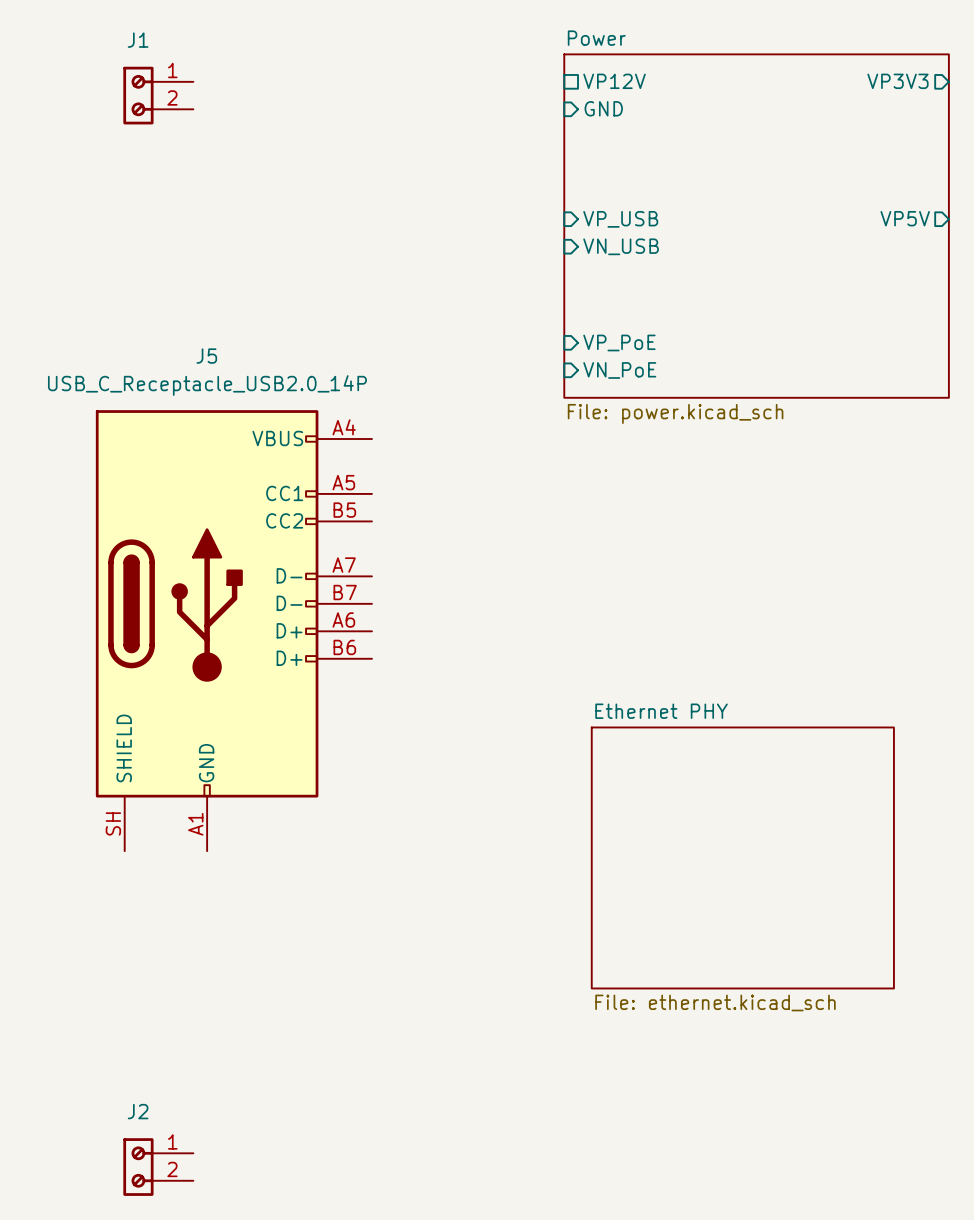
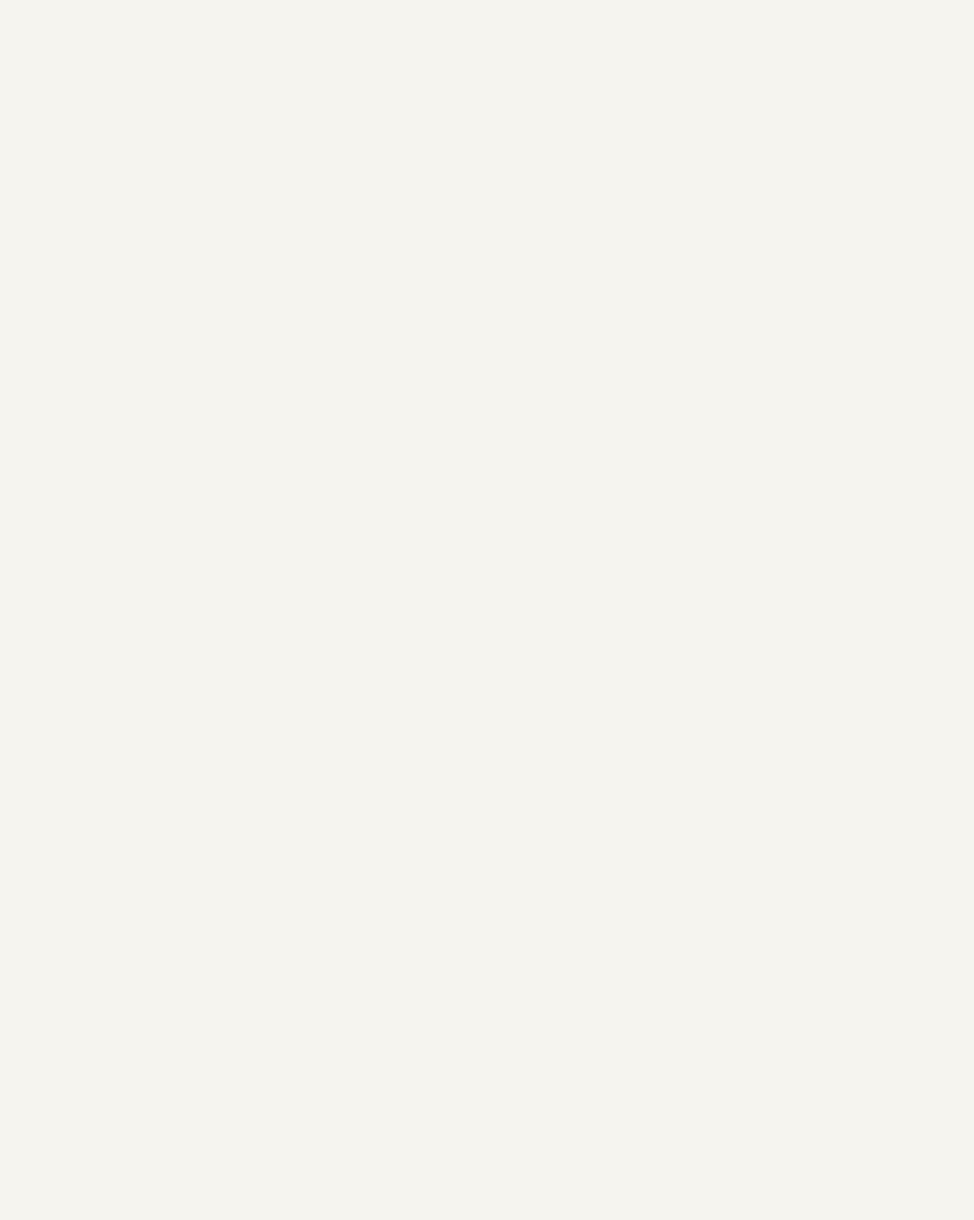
sheet pin: VP12V (614, 81) -> none
sheet pin: VP3V3 (897, 81) -> none
J1: (158, 95) -> none
sheet pin: GND (603, 108) -> none
sheet pin: VP5V (905, 218) -> none
sheet pin: VP_USB (620, 219) -> none
sheet Power: File: power.kicad_sch (756, 226) -> none
sheet pin: VN_USB (621, 246) -> none
sheet pin: VP_PoE (619, 342) -> none
sheet pin: VN_PoE (619, 370) -> none
J5: USB_C_Receptacle_USB2.0_14P (233, 630) -> none
sheet Ethernet PHY: File: ethernet.kicad_sch (742, 857) -> none
J2: (158, 1167) -> none

